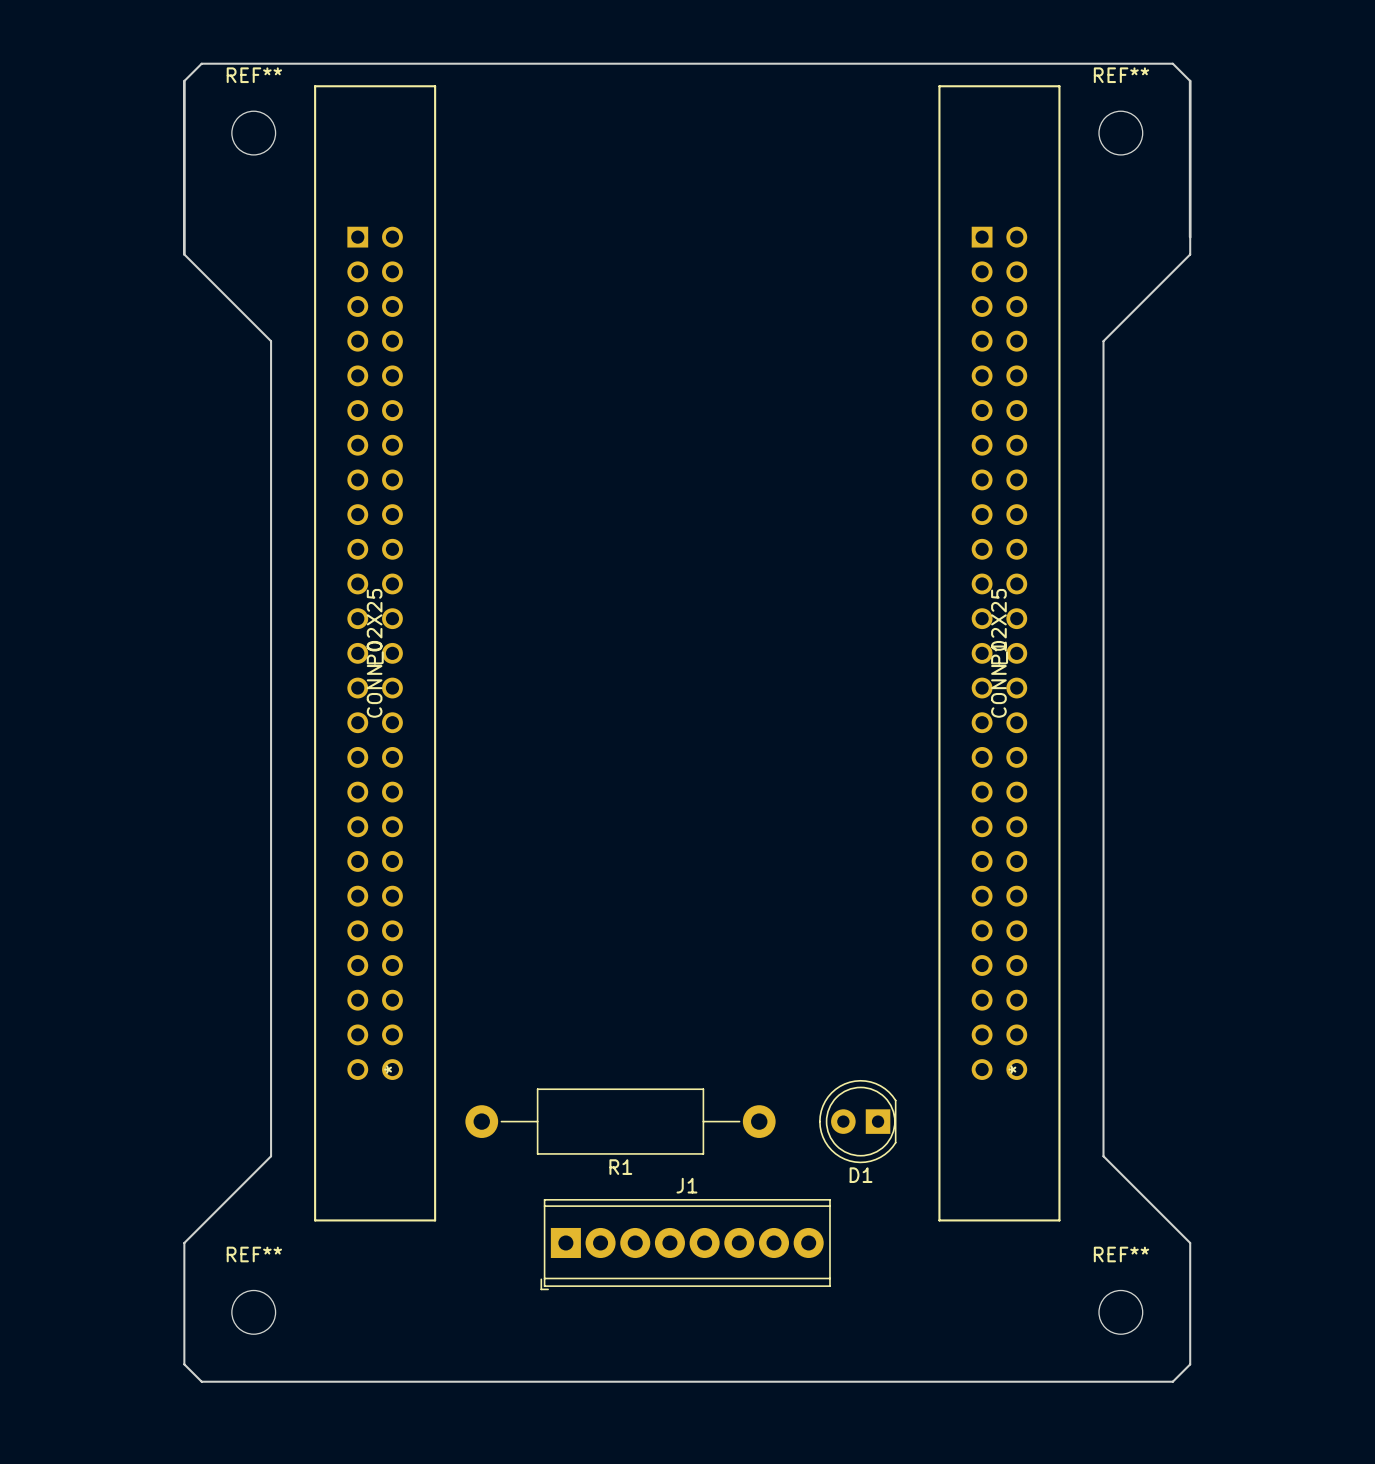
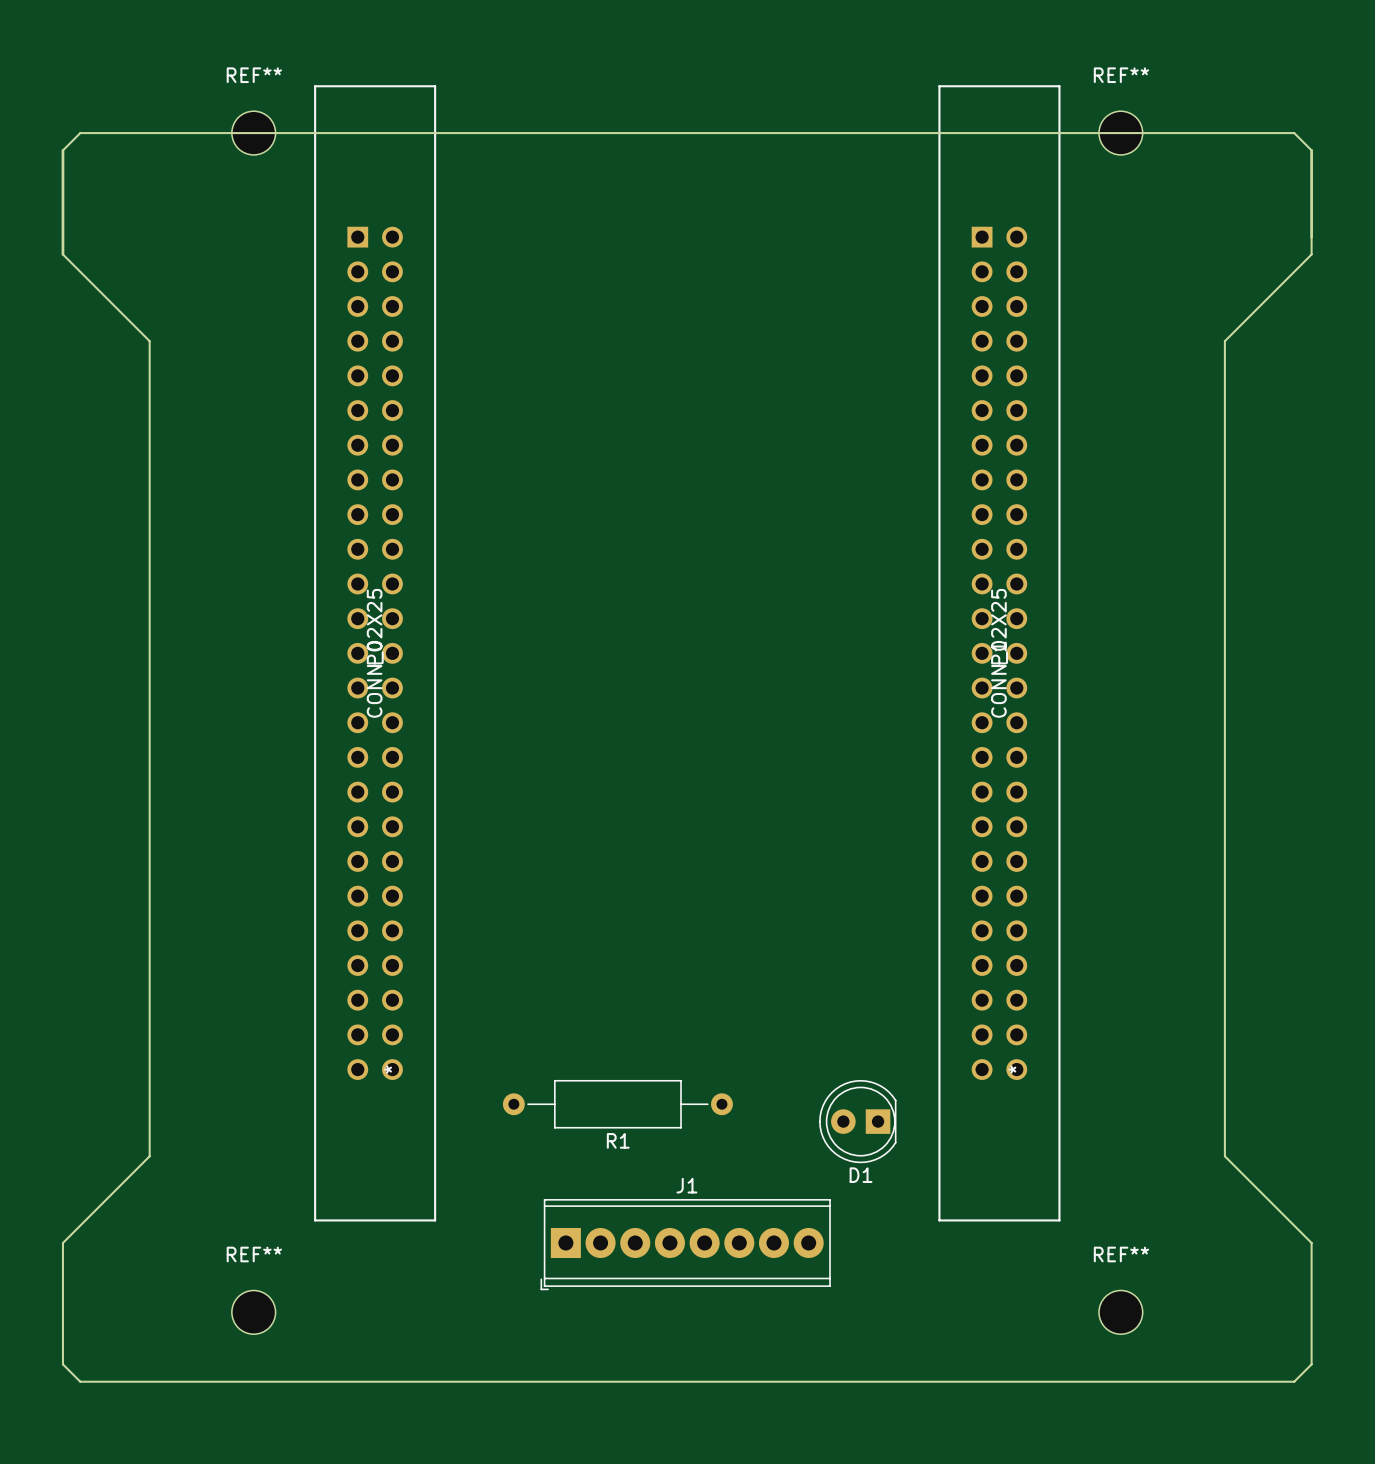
R1 footprint: [465, 1088, 776, 1155] -> [502, 1079, 733, 1129]
board edge: (201, 1381) (184, 1364) (184, 1242) (271, 1156) (271, 341) (184, 254) (184, 81) (201, 63) (1172, 63) (1190, 81) (1190, 254) (1103, 341) (1103, 1156) (1190, 1242) (1190, 1364) (1172, 1381) -> (201, 1381) (80, 1381) (62, 1364) (62, 1242) (149, 1156) (149, 341) (62, 254) (62, 150) (80, 133) (1294, 133) (1311, 150) (1311, 254) (1224, 341) (1224, 1156) (1311, 1242) (1311, 1364) (1294, 1381) (1172, 1381)

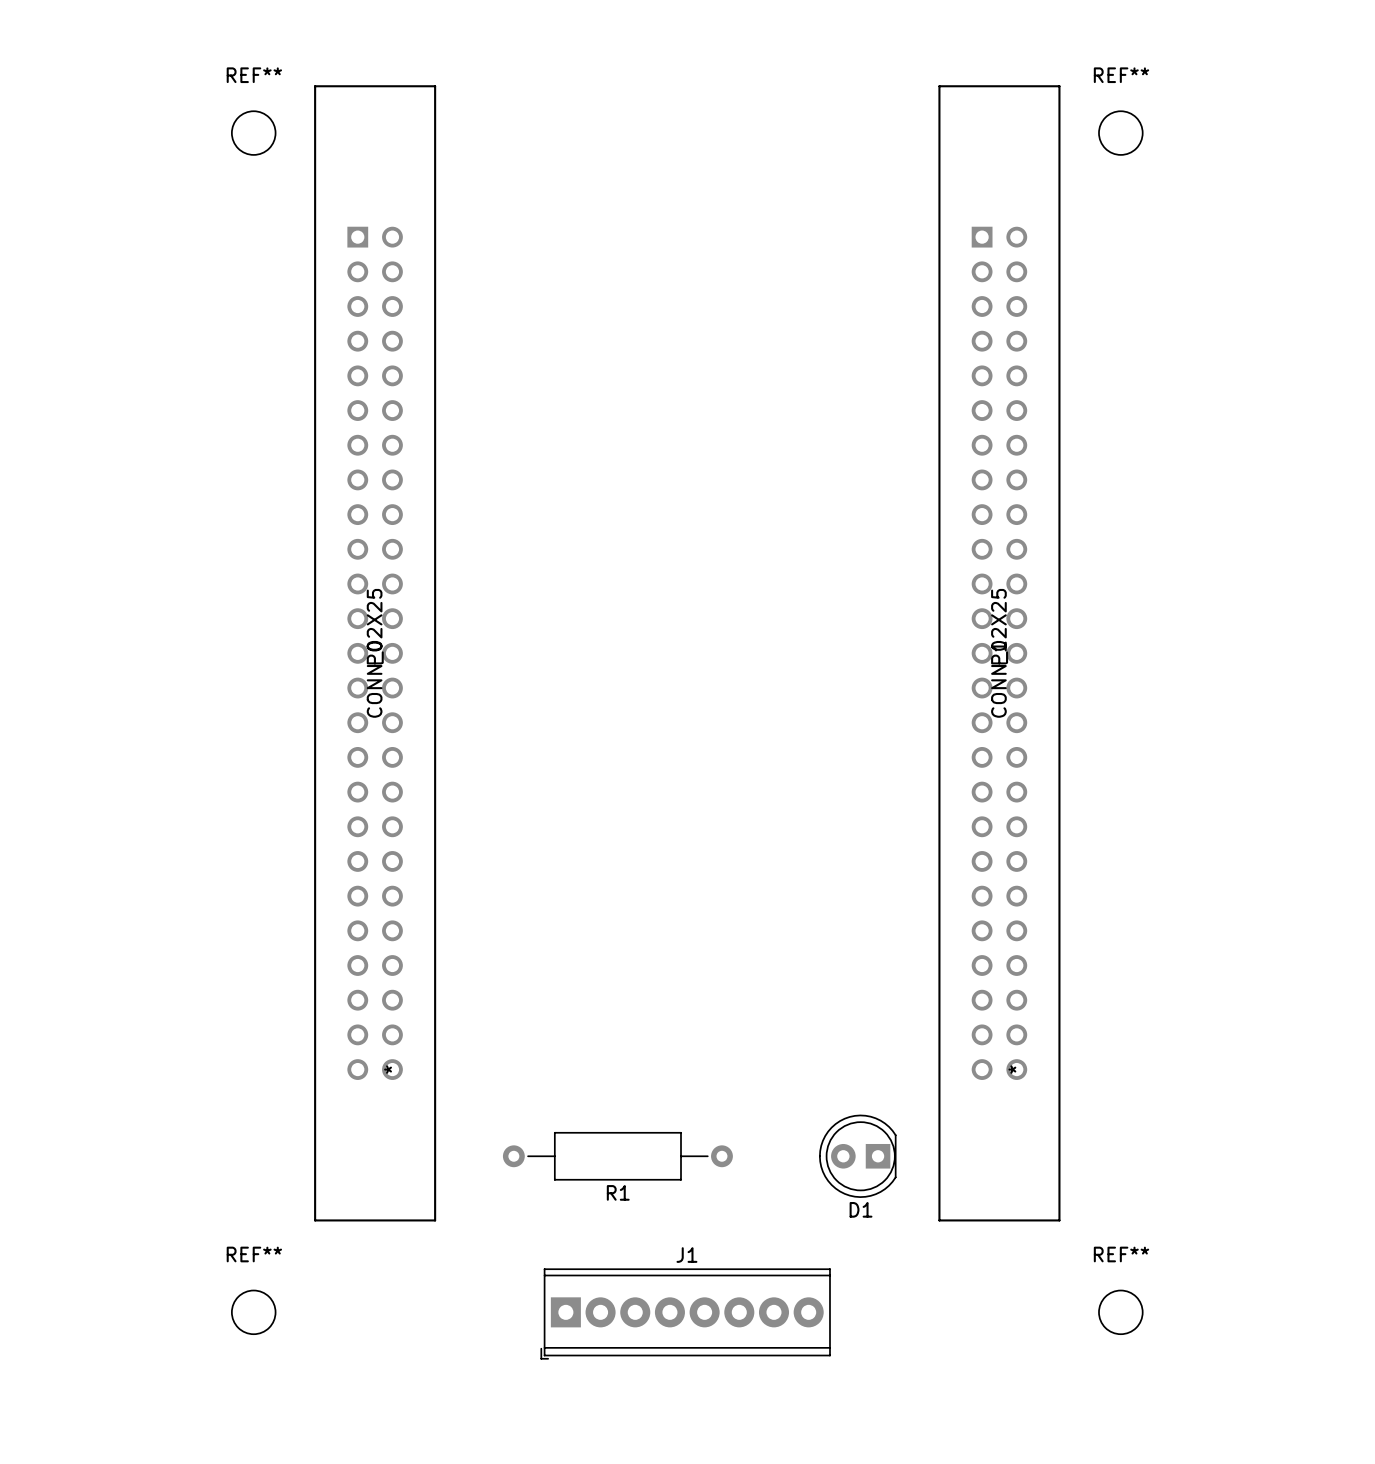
board edge: (80, 133) (1294, 133) (1311, 150) (1311, 254) (1224, 341) (1224, 1156) (1311, 1242) (1311, 1364) (1294, 1381) (80, 1381) (62, 1364) (62, 1242) (149, 1156) (149, 341) (62, 254) (62, 150) (80, 133) -> none
R1 position: (617, 1104) -> (617, 1156)
D1 position: (857, 1121) -> (857, 1156)
J1 position: (685, 1244) -> (685, 1313)

